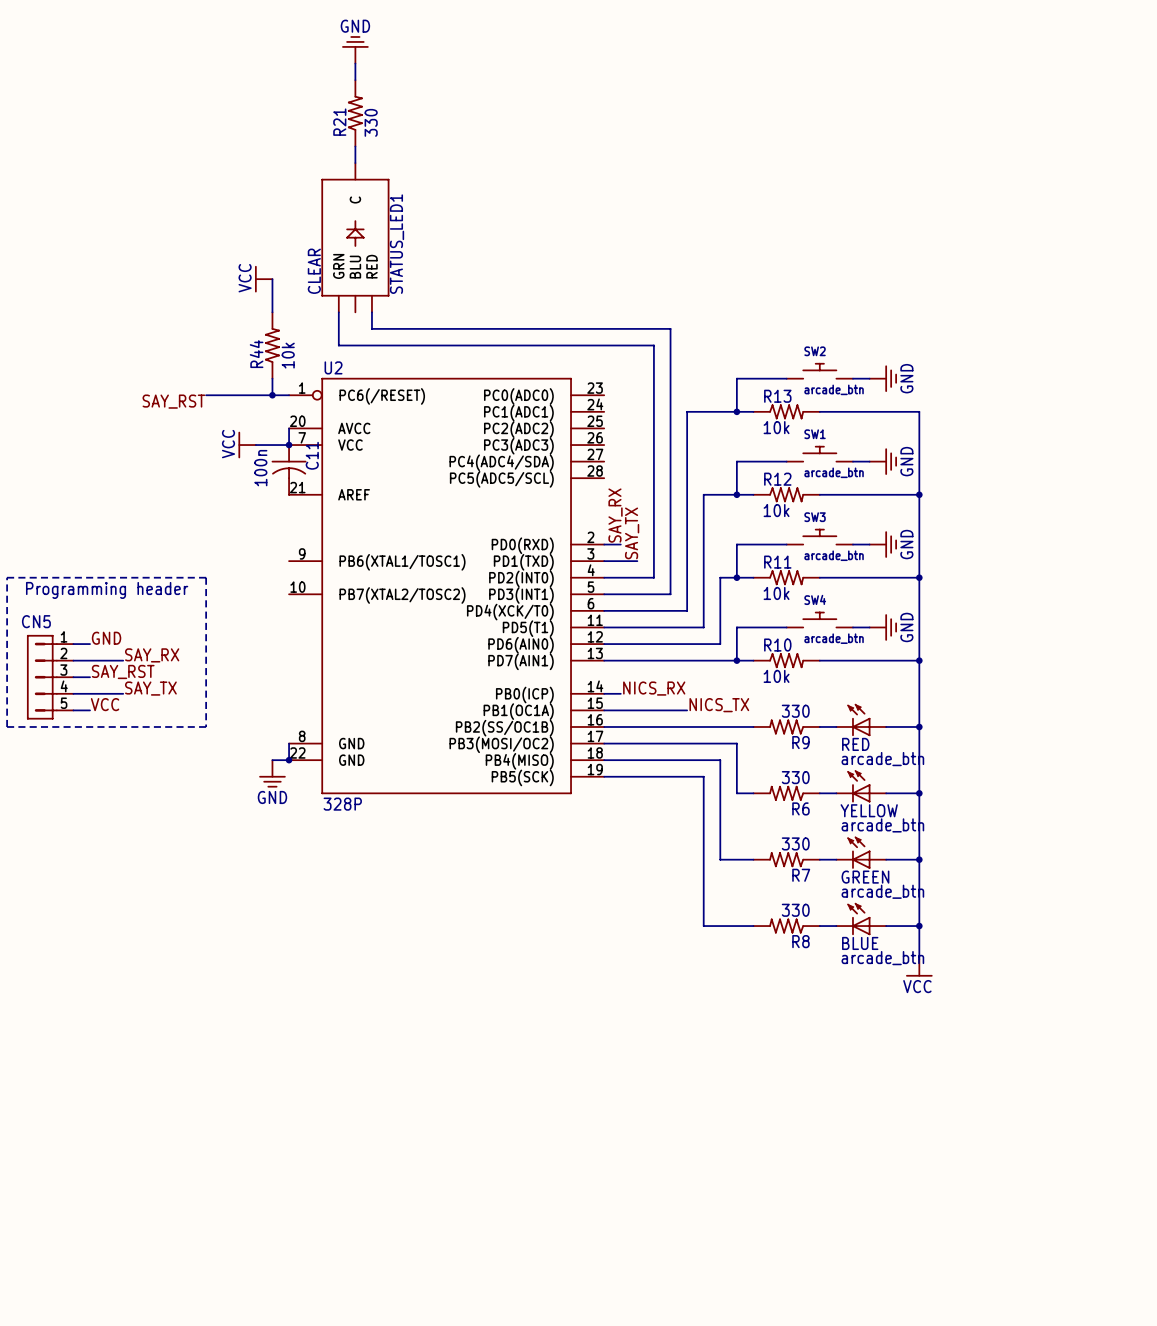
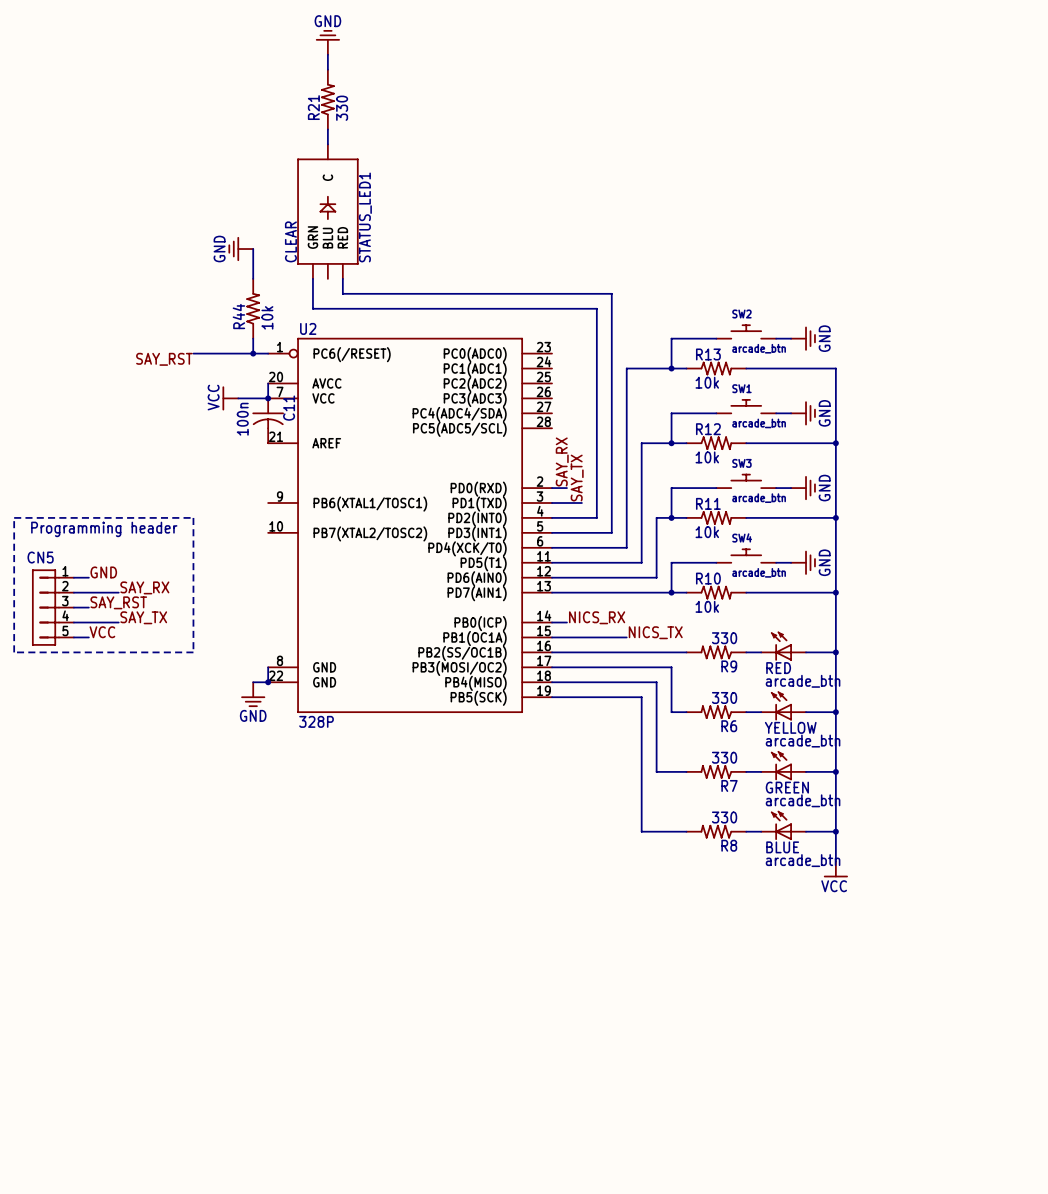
power symbol: VCC (263, 279) -> GND (240, 249)

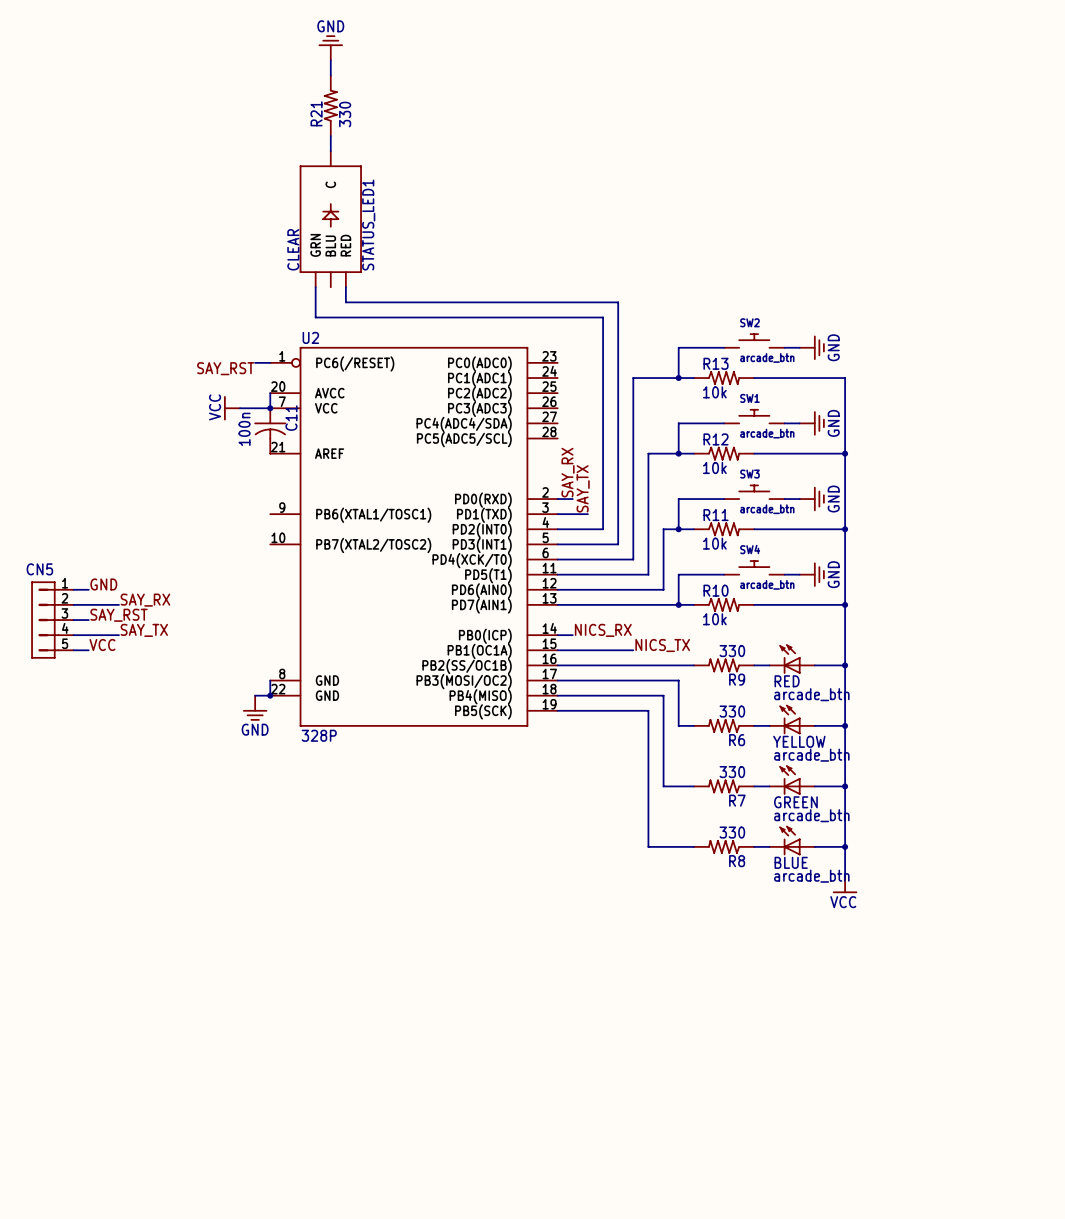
power symbol: GND (240, 249) -> none
wire: (253, 249) (253, 278) -> none
R44: 10k (253, 308) -> none
wire: (253, 338) (253, 353) (193, 353) -> none
junction: (253, 353) -> none
label position: SAY_RST (164, 359) -> SAY_RST (225, 368)
line: (14, 517) (193, 517) (193, 652) (14, 652) (14, 517) -> none
text: Programming header (104, 529) -> none

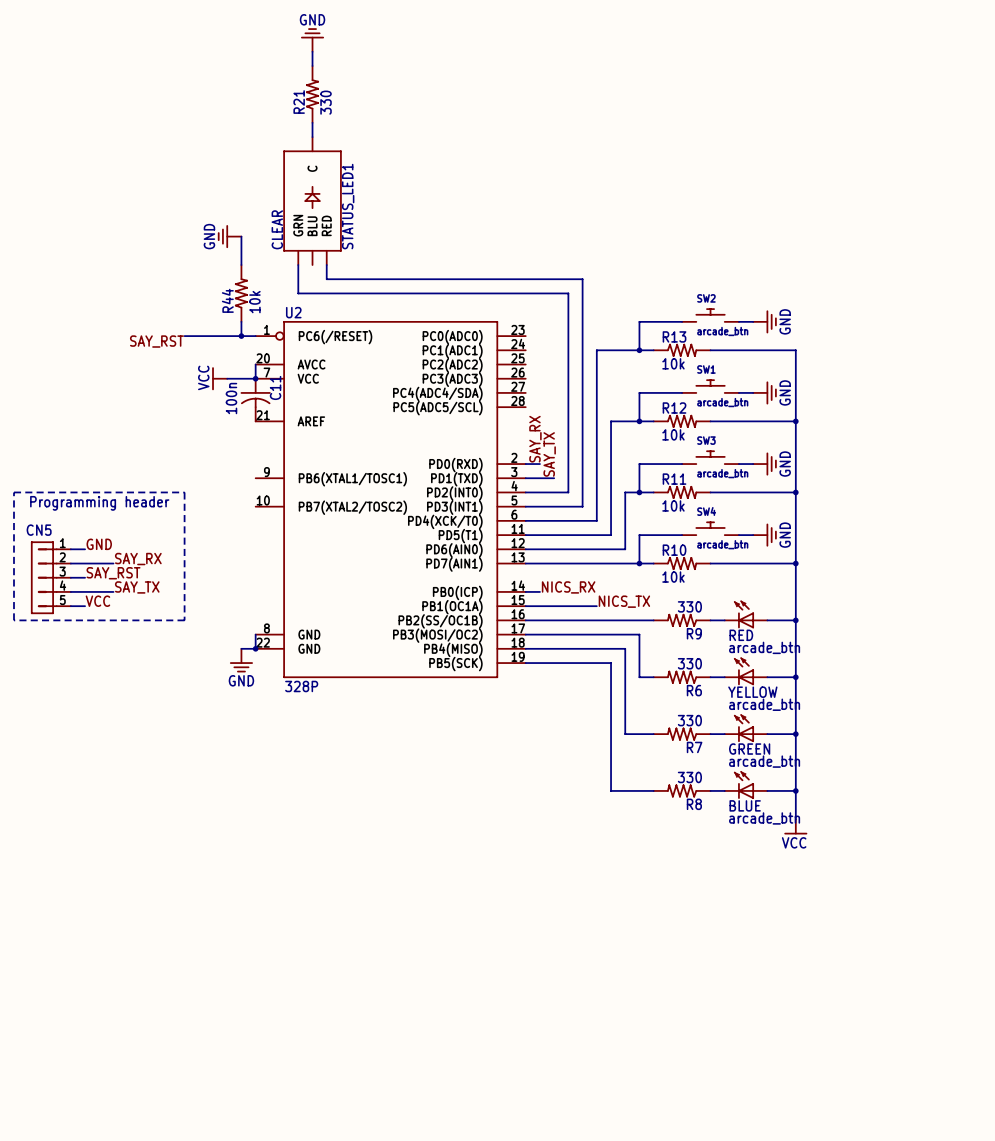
power symbol: none -> GND (229, 236)
wire: none -> (241, 236) (241, 265)
R44: none -> 10k (241, 293)
wire: none -> (241, 321) (241, 336) (184, 336)
junction: none -> (241, 336)
label position: SAY_RST (225, 368) -> SAY_RST (156, 341)
line: none -> (14, 492) (184, 492) (184, 620) (14, 620) (14, 492)
text: none -> Programming header (99, 503)

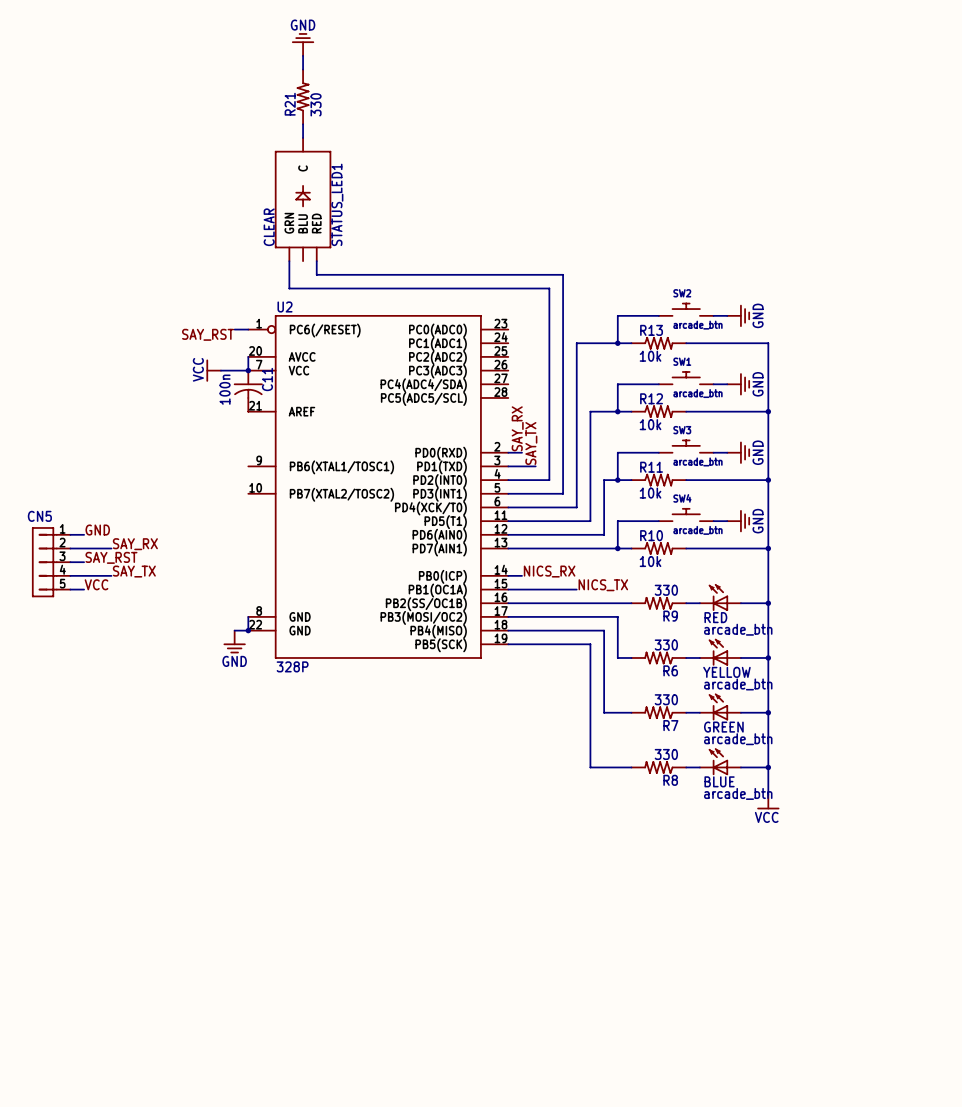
power symbol: GND (229, 236) -> none
wire: (241, 236) (241, 265) -> none
R44: 10k (241, 293) -> none
wire: (241, 321) (241, 336) (184, 336) -> none
junction: (241, 336) -> none
label position: SAY_RST (156, 341) -> SAY_RST (208, 334)
line: (14, 492) (184, 492) (184, 620) (14, 620) (14, 492) -> none
text: Programming header (99, 503) -> none

